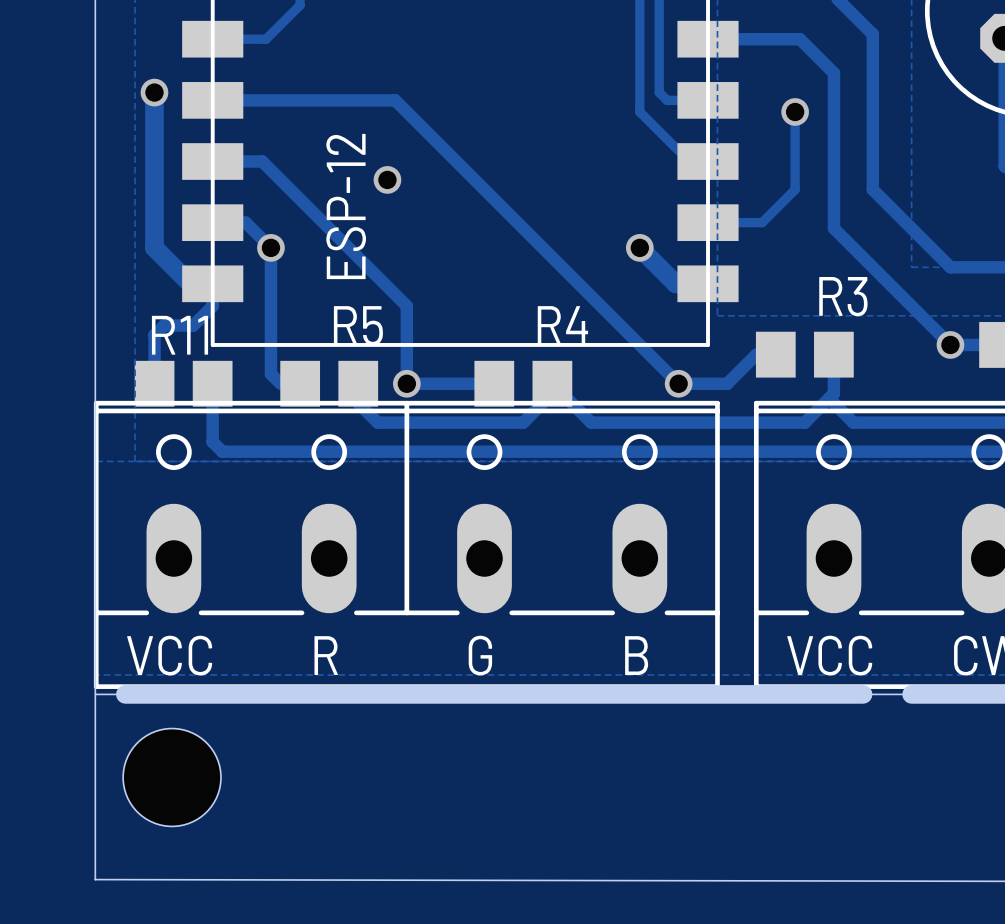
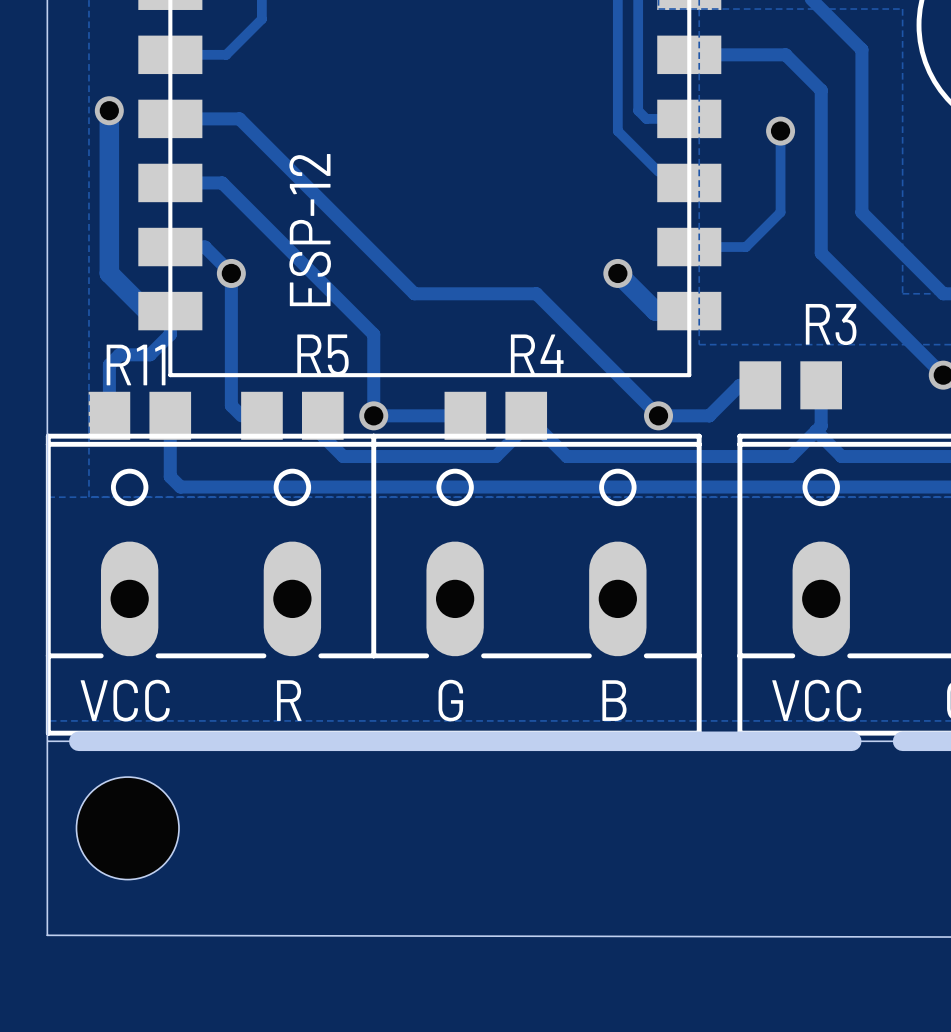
track: (278, 100) (395, 100) (562, 267) -> (239, 118) (414, 293) (536, 293)
via: (387, 179) -> none

